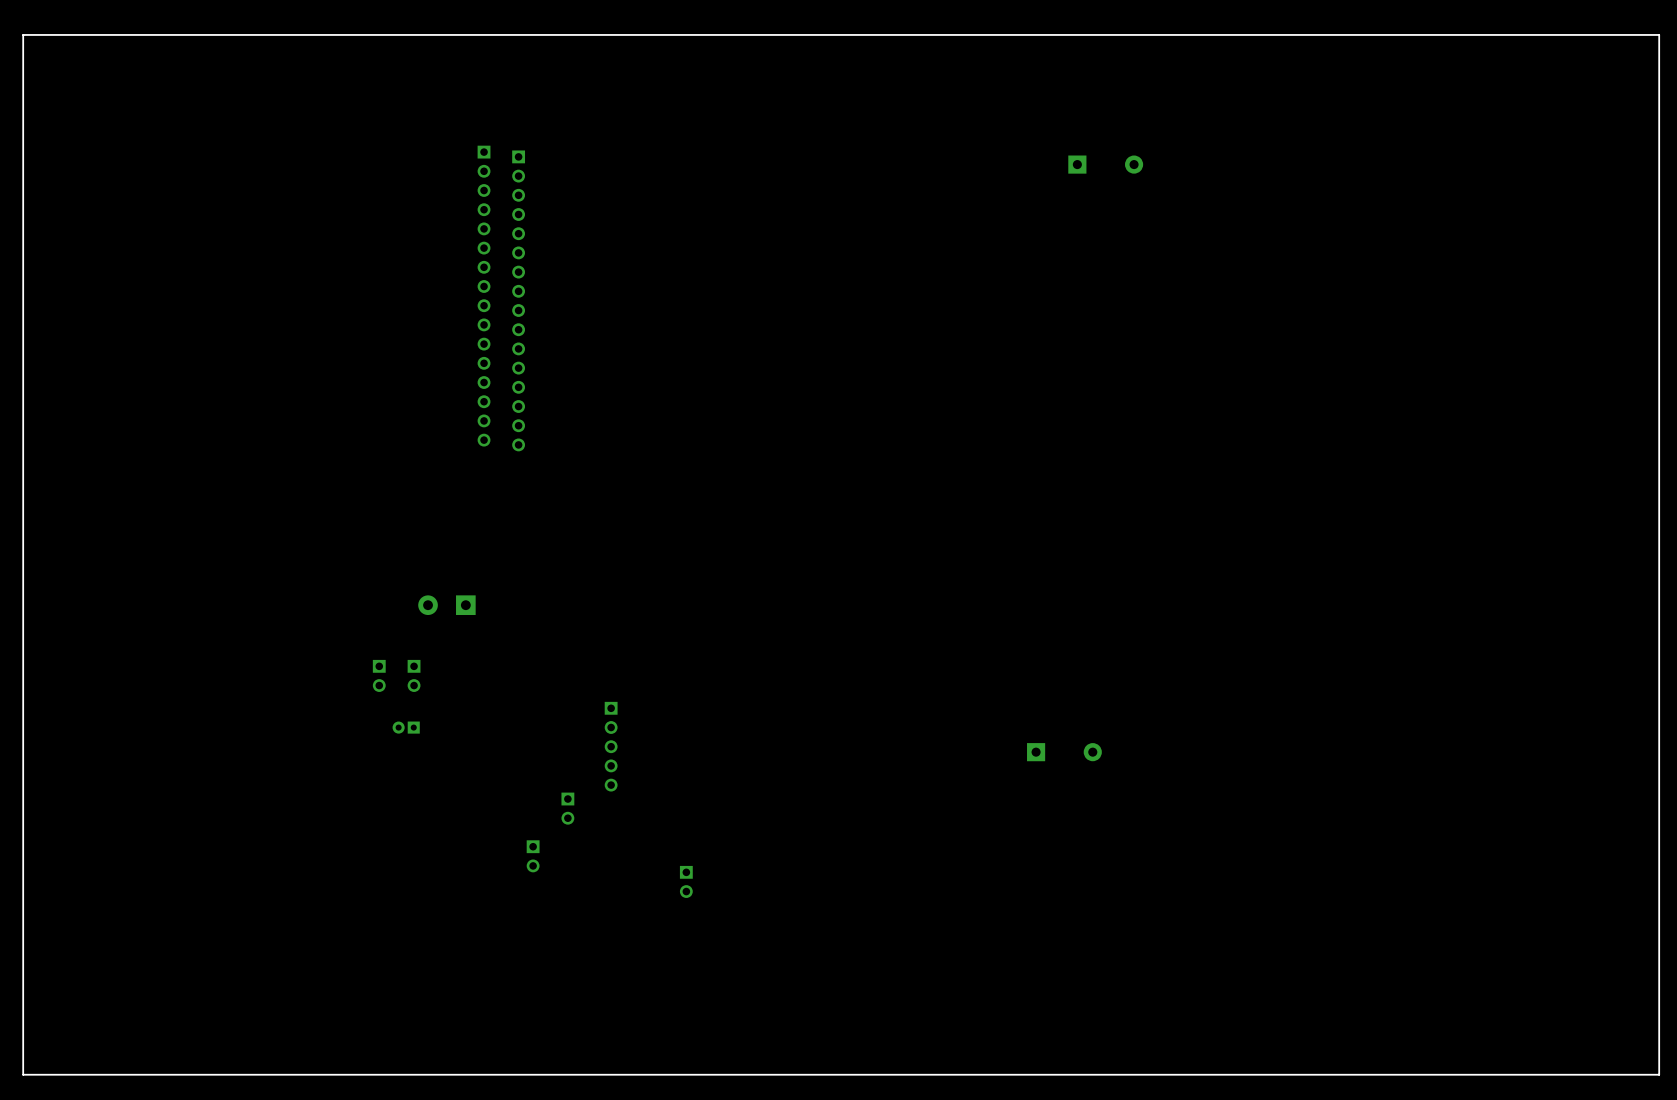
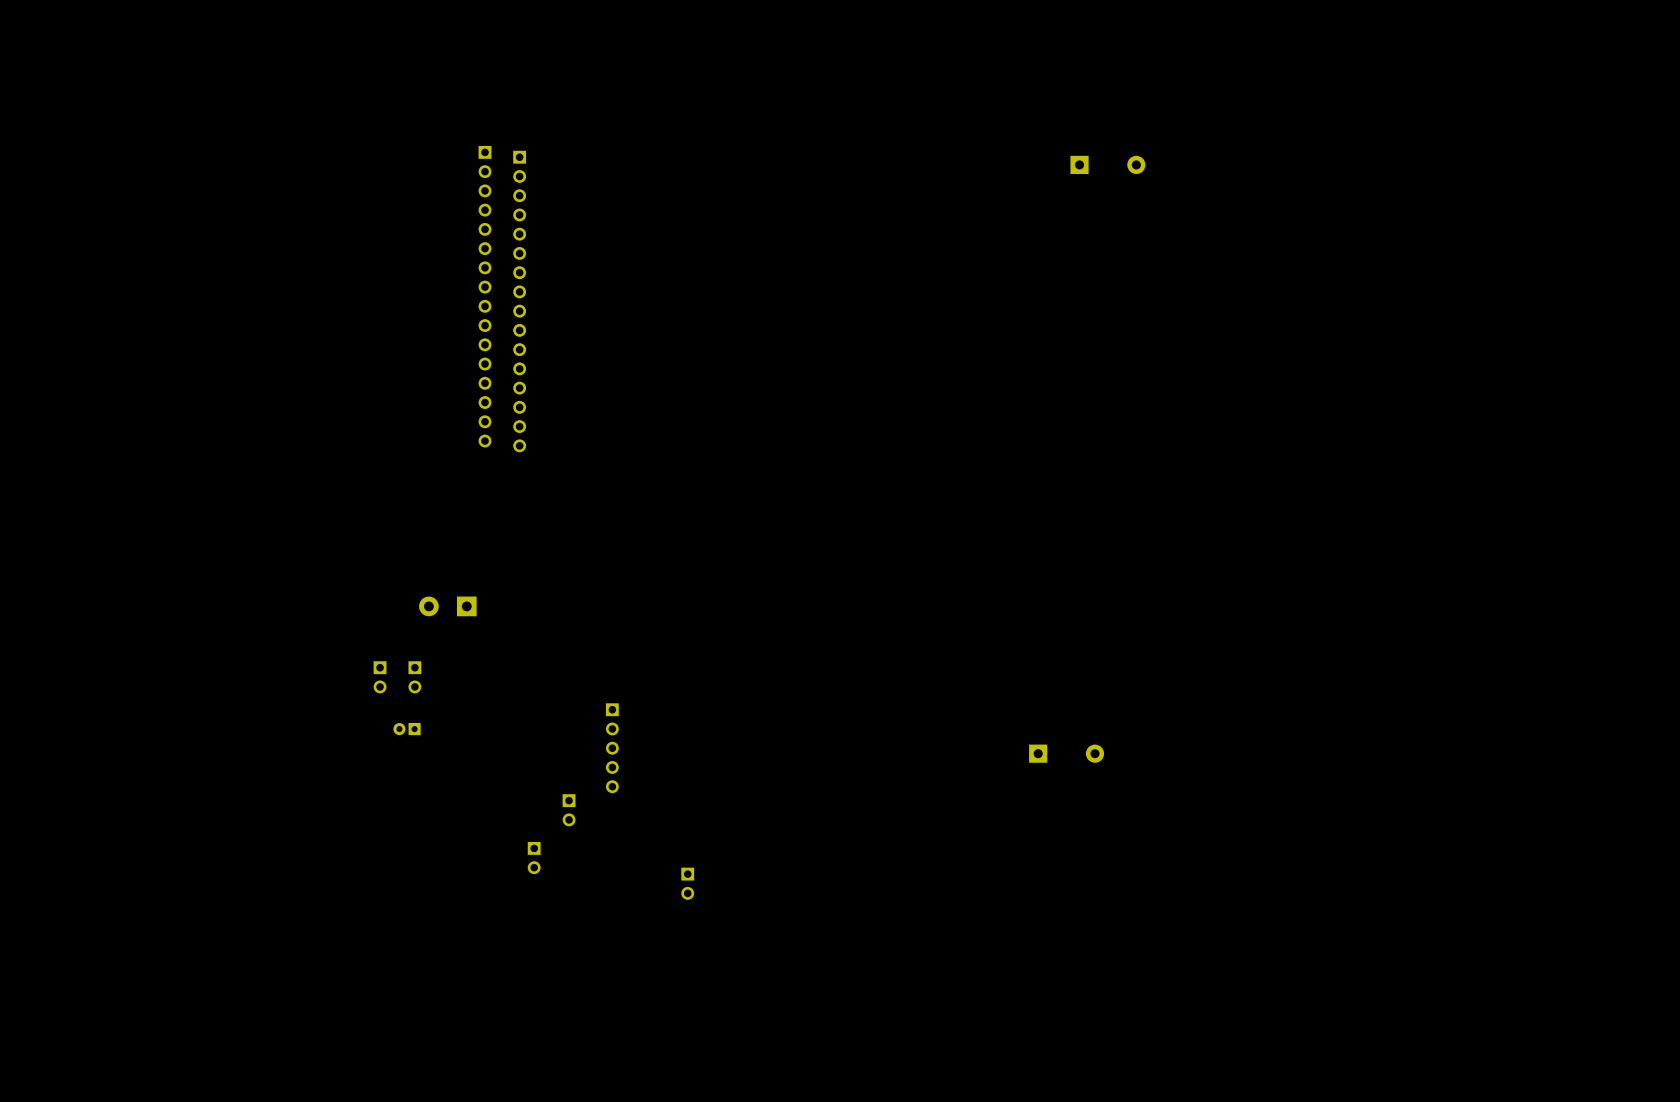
board edge: (1659, 34) (1659, 1074) (23, 1074) (23, 34) (1659, 34) -> none

